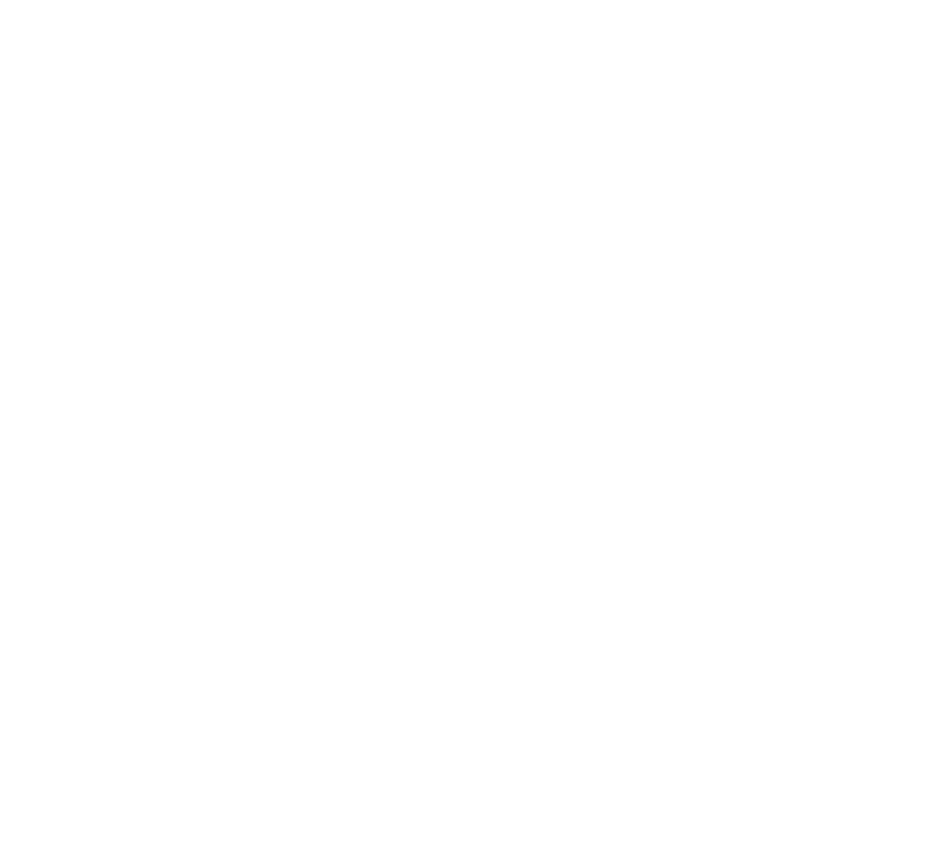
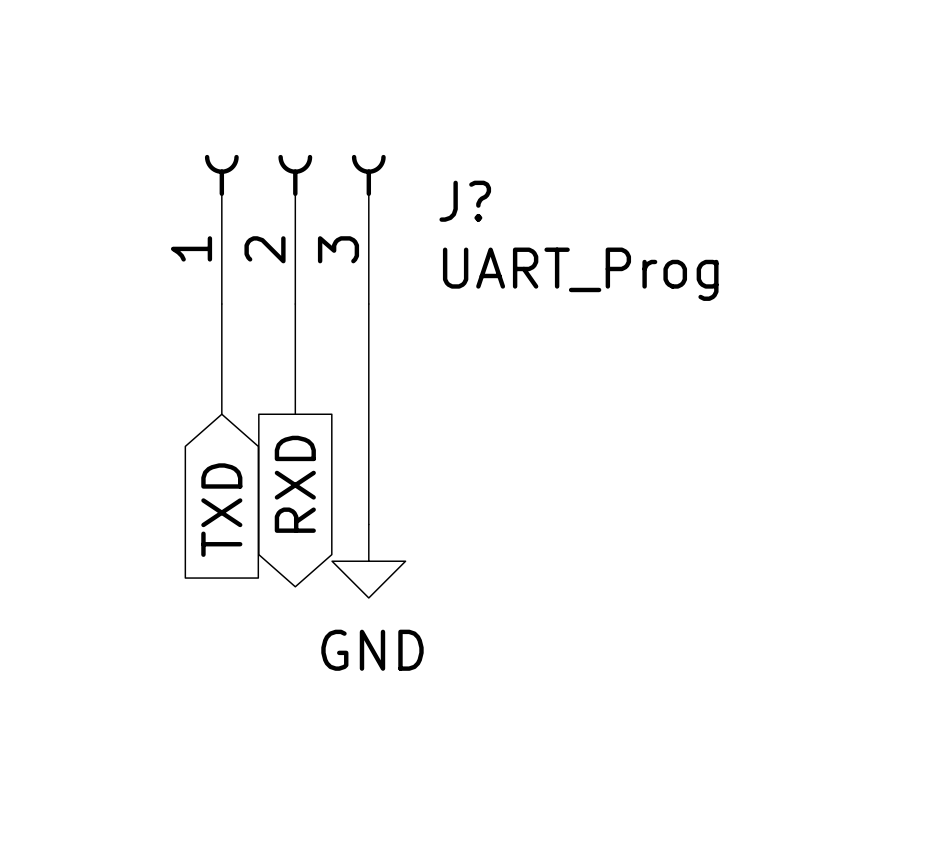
J?: none -> UART_Prog (295, 229)
wire: none -> (221, 304) (221, 414)
wire: none -> (295, 304) (295, 414)
wire: none -> (368, 304) (368, 524)
global label: none -> RXD (295, 484)
global label: none -> TXD (221, 510)
power symbol: none -> GND (368, 561)

